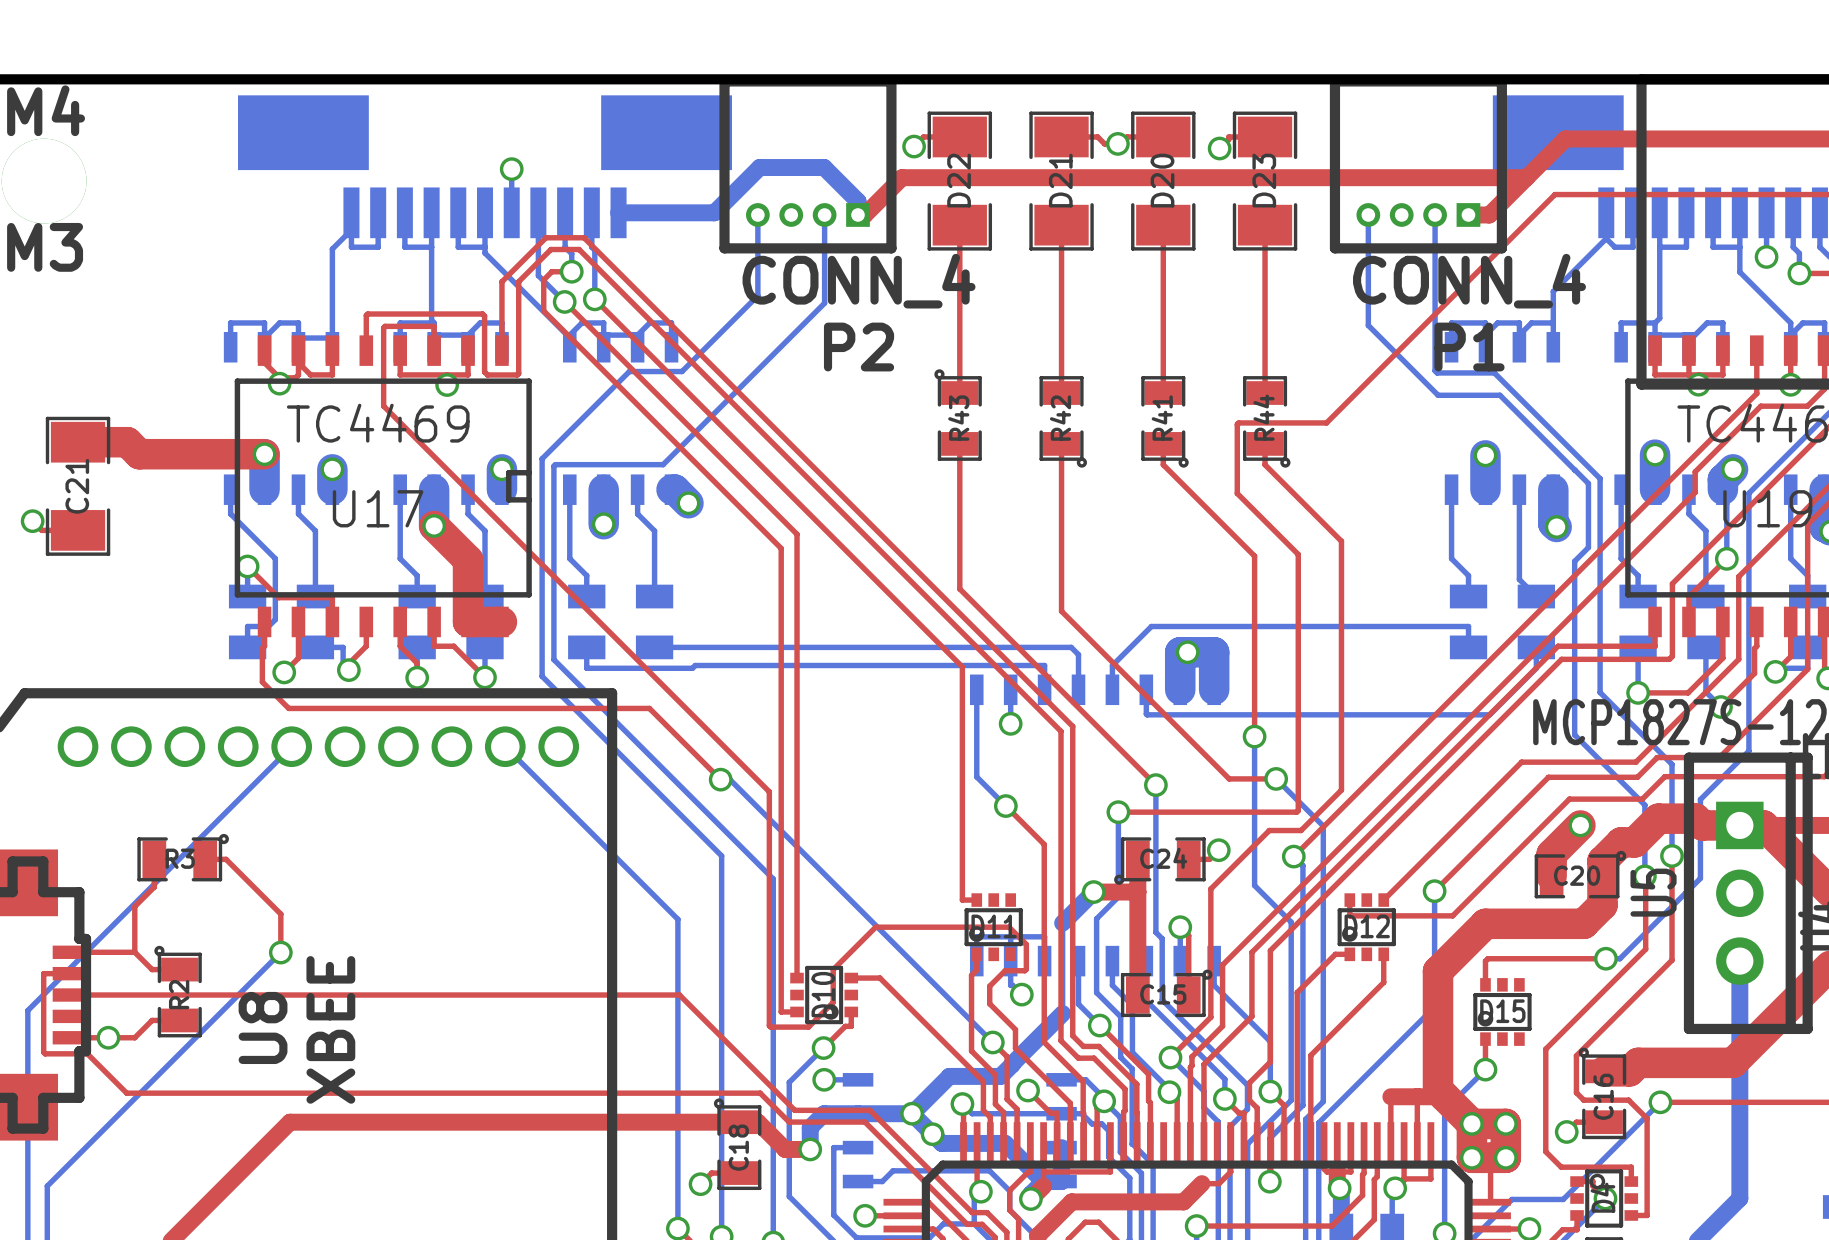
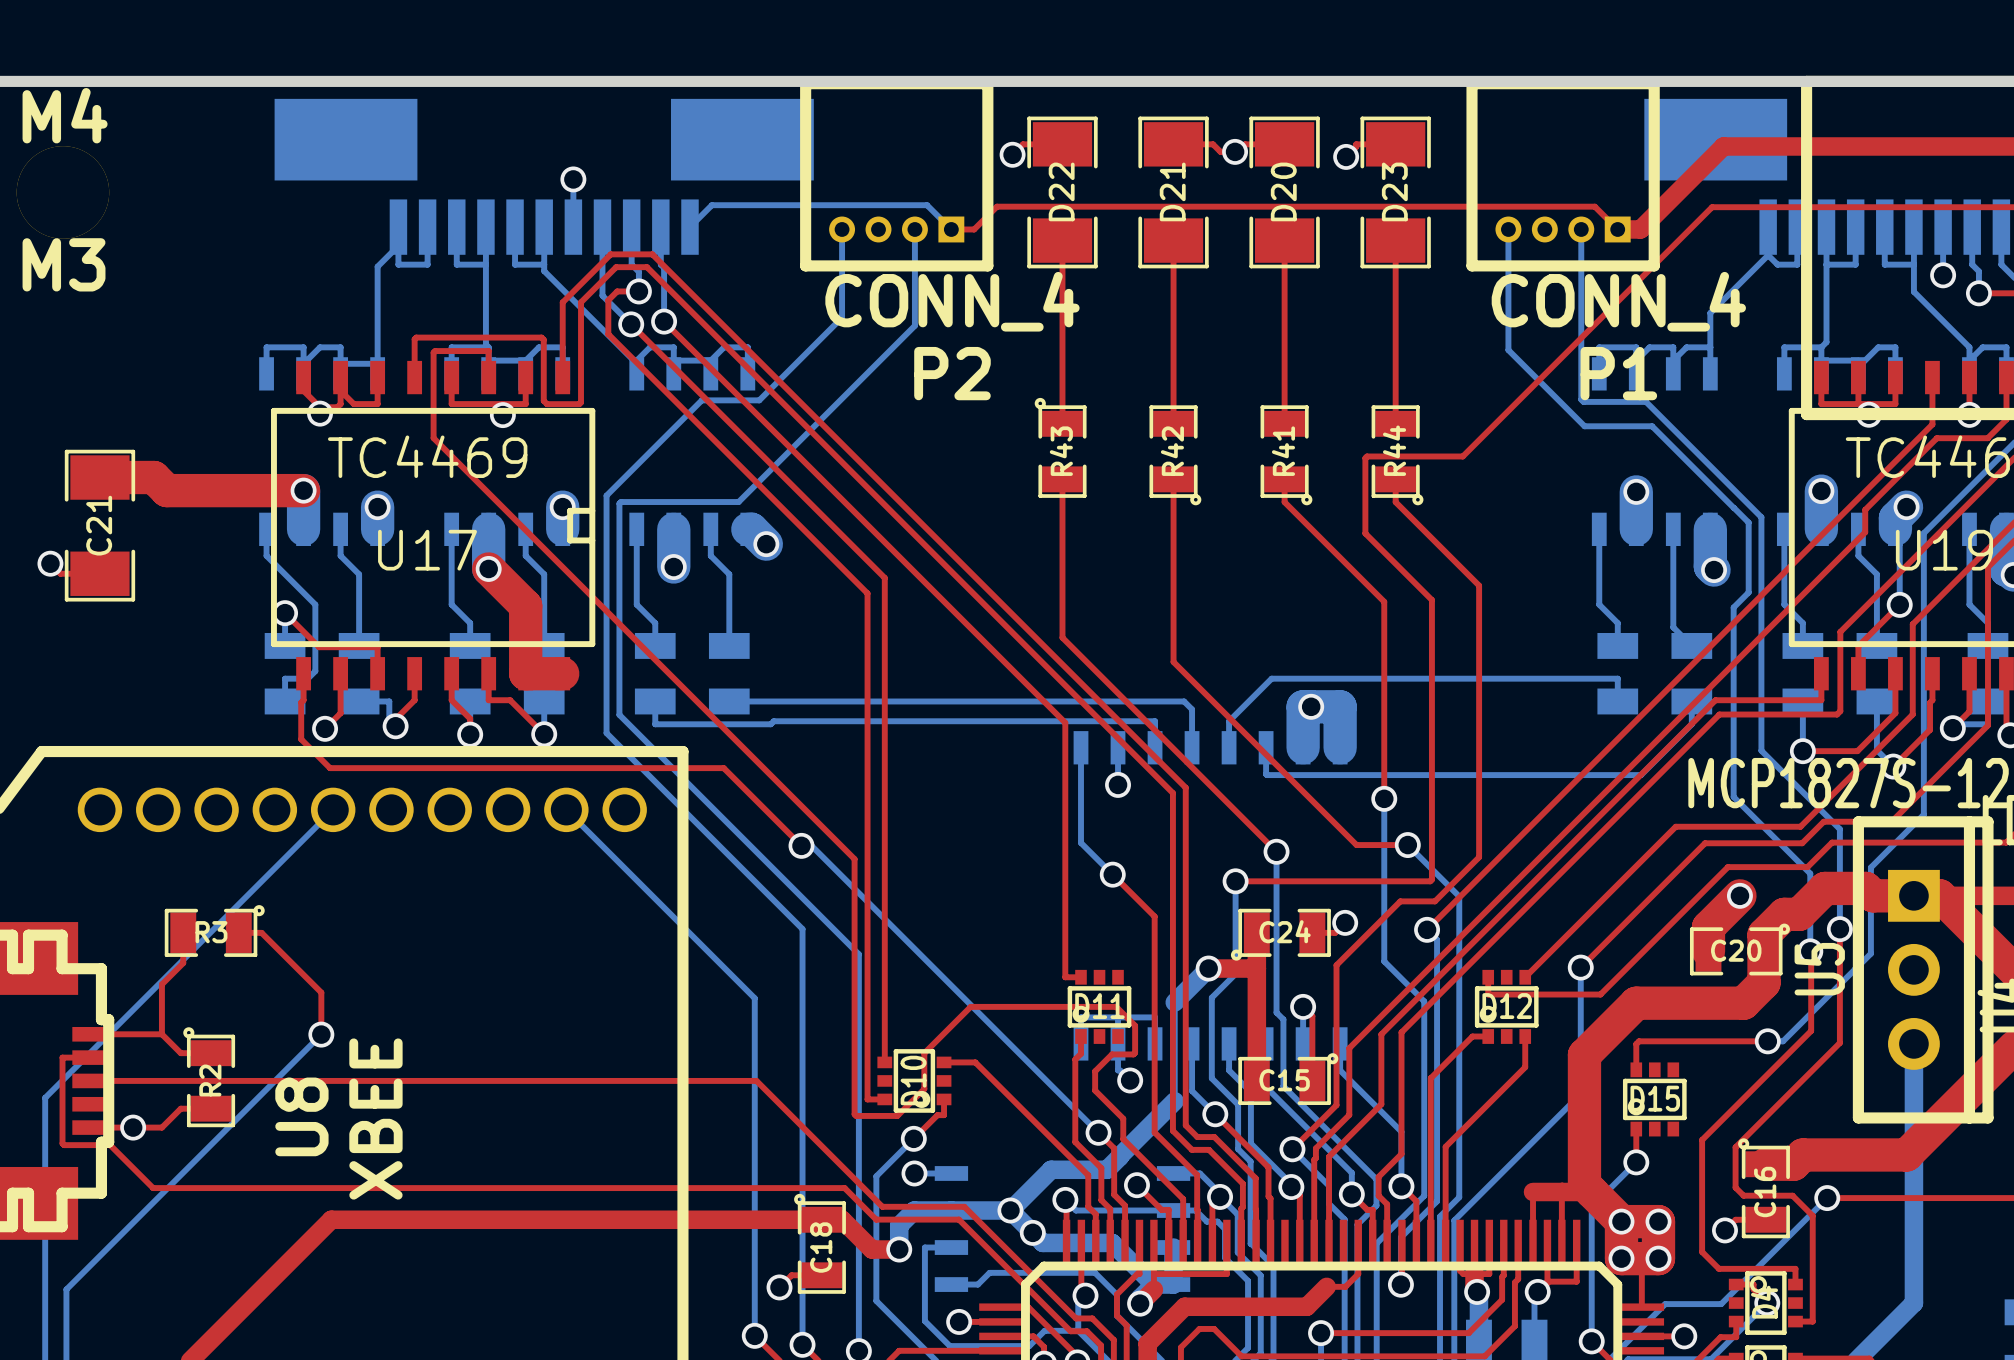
top track: (1526, 177) (902, 177) (864, 214) -> (1617, 229) (1594, 206) (996, 206) (974, 229) (958, 229)
bottom track: (618, 212) (714, 212) (759, 167) (824, 167) (857, 201) (857, 214) -> (689, 227) (711, 205) (927, 205) (951, 229)

